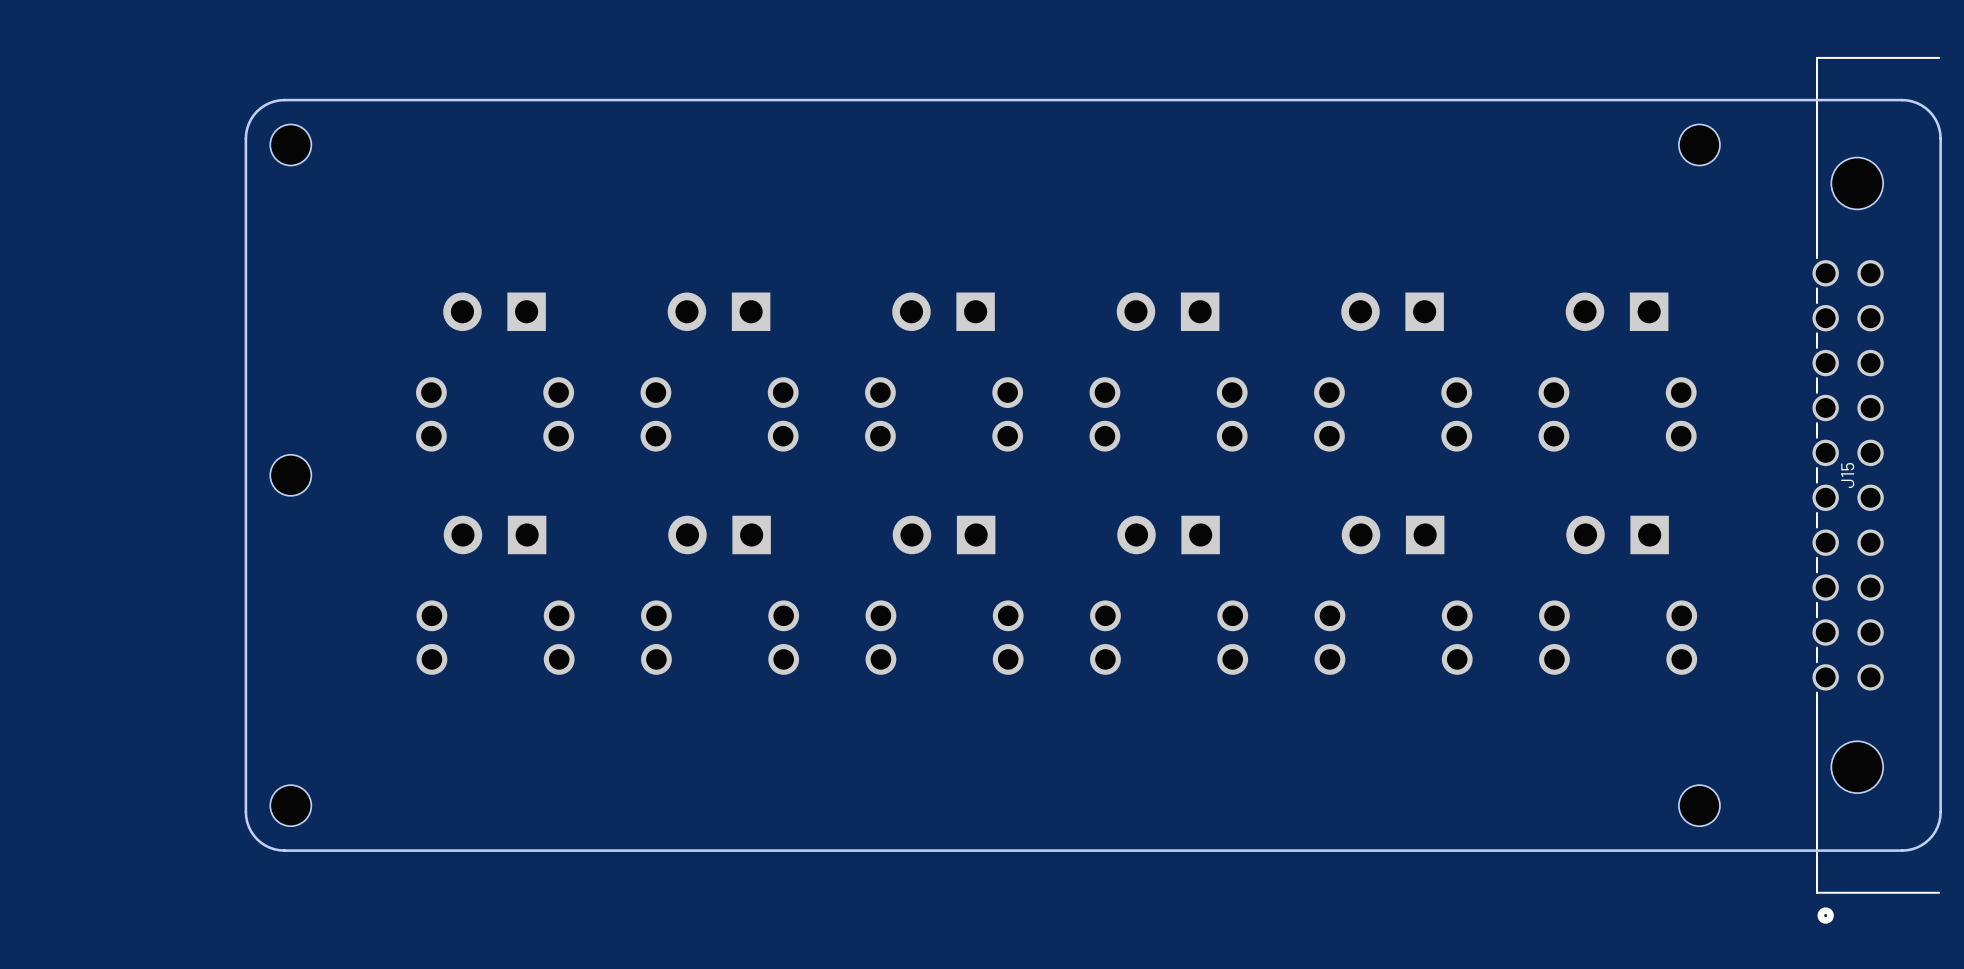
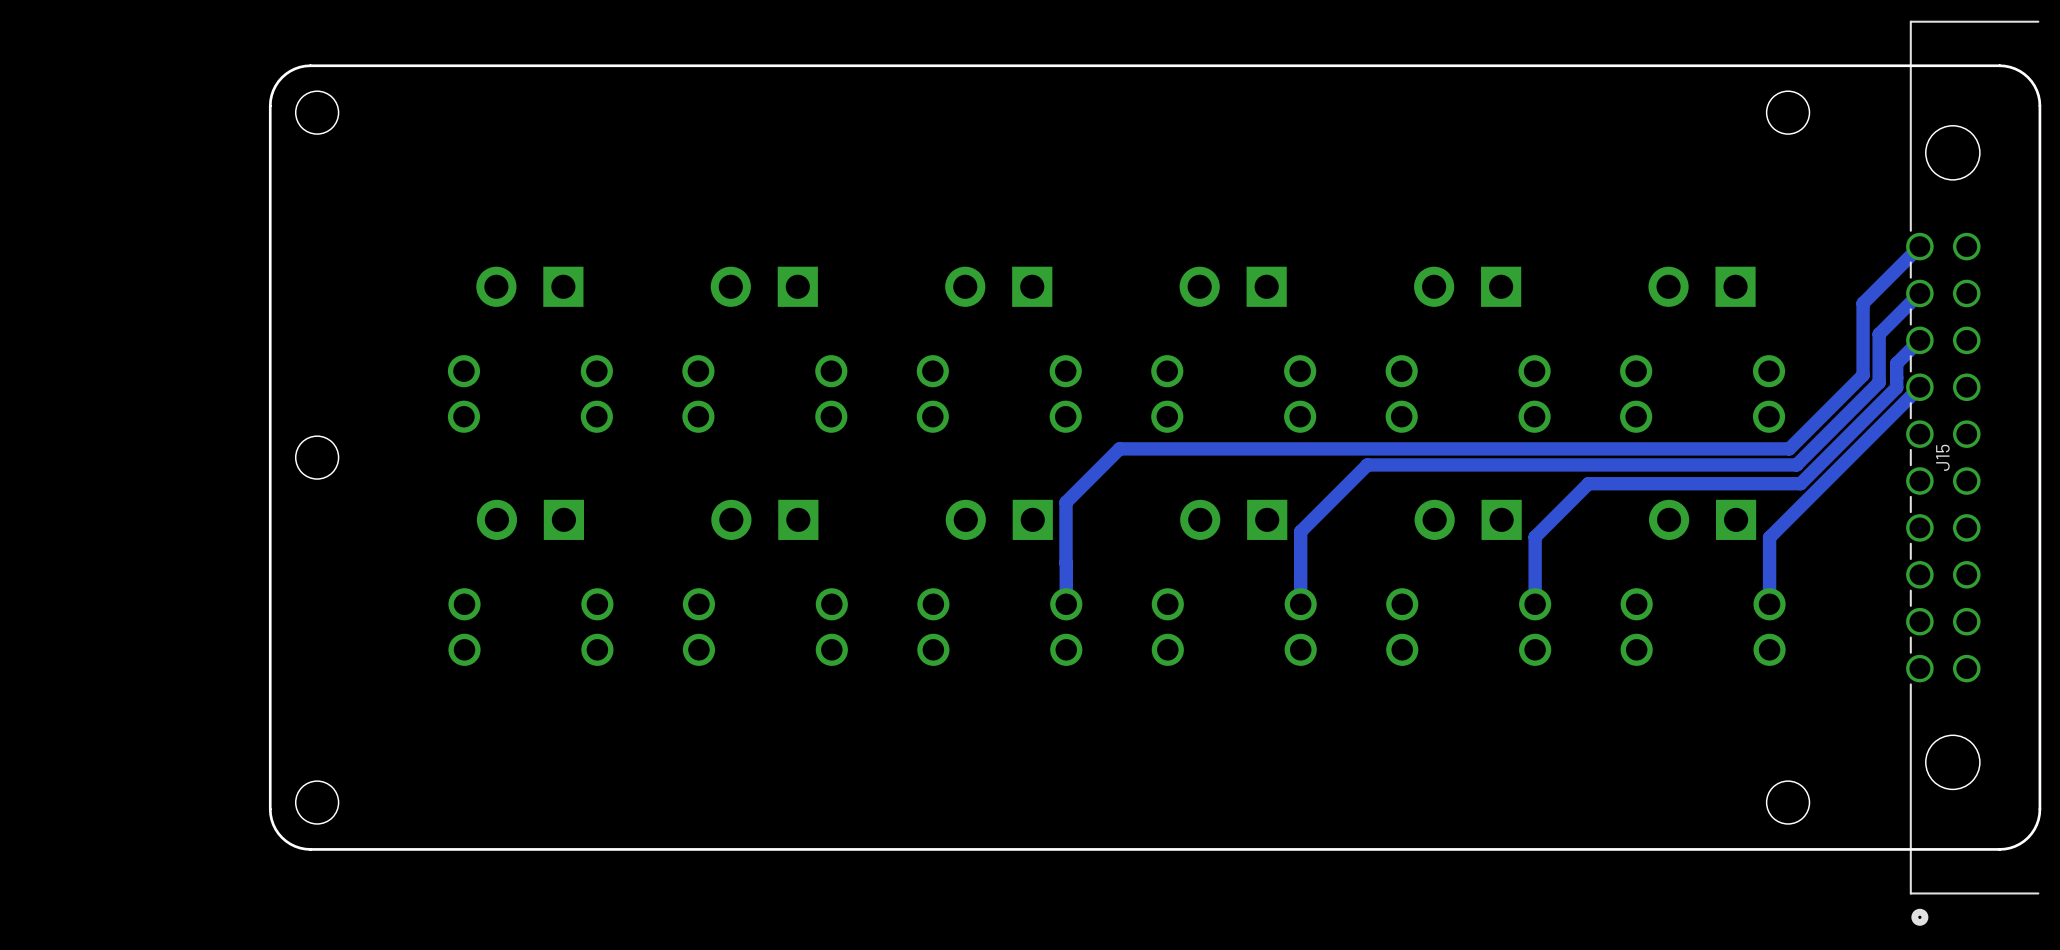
track: none -> (1919, 246) (1863, 303) (1863, 375) (1789, 448) (1119, 448) (1066, 502) (1066, 604)
track: none -> (1919, 293) (1879, 334) (1879, 382) (1796, 464) (1367, 464) (1300, 531) (1300, 604)
track: none -> (1919, 340) (1896, 363) (1896, 387) (1800, 483) (1588, 483) (1535, 537) (1535, 604)
track: none -> (1919, 387) (1769, 537) (1769, 604)

